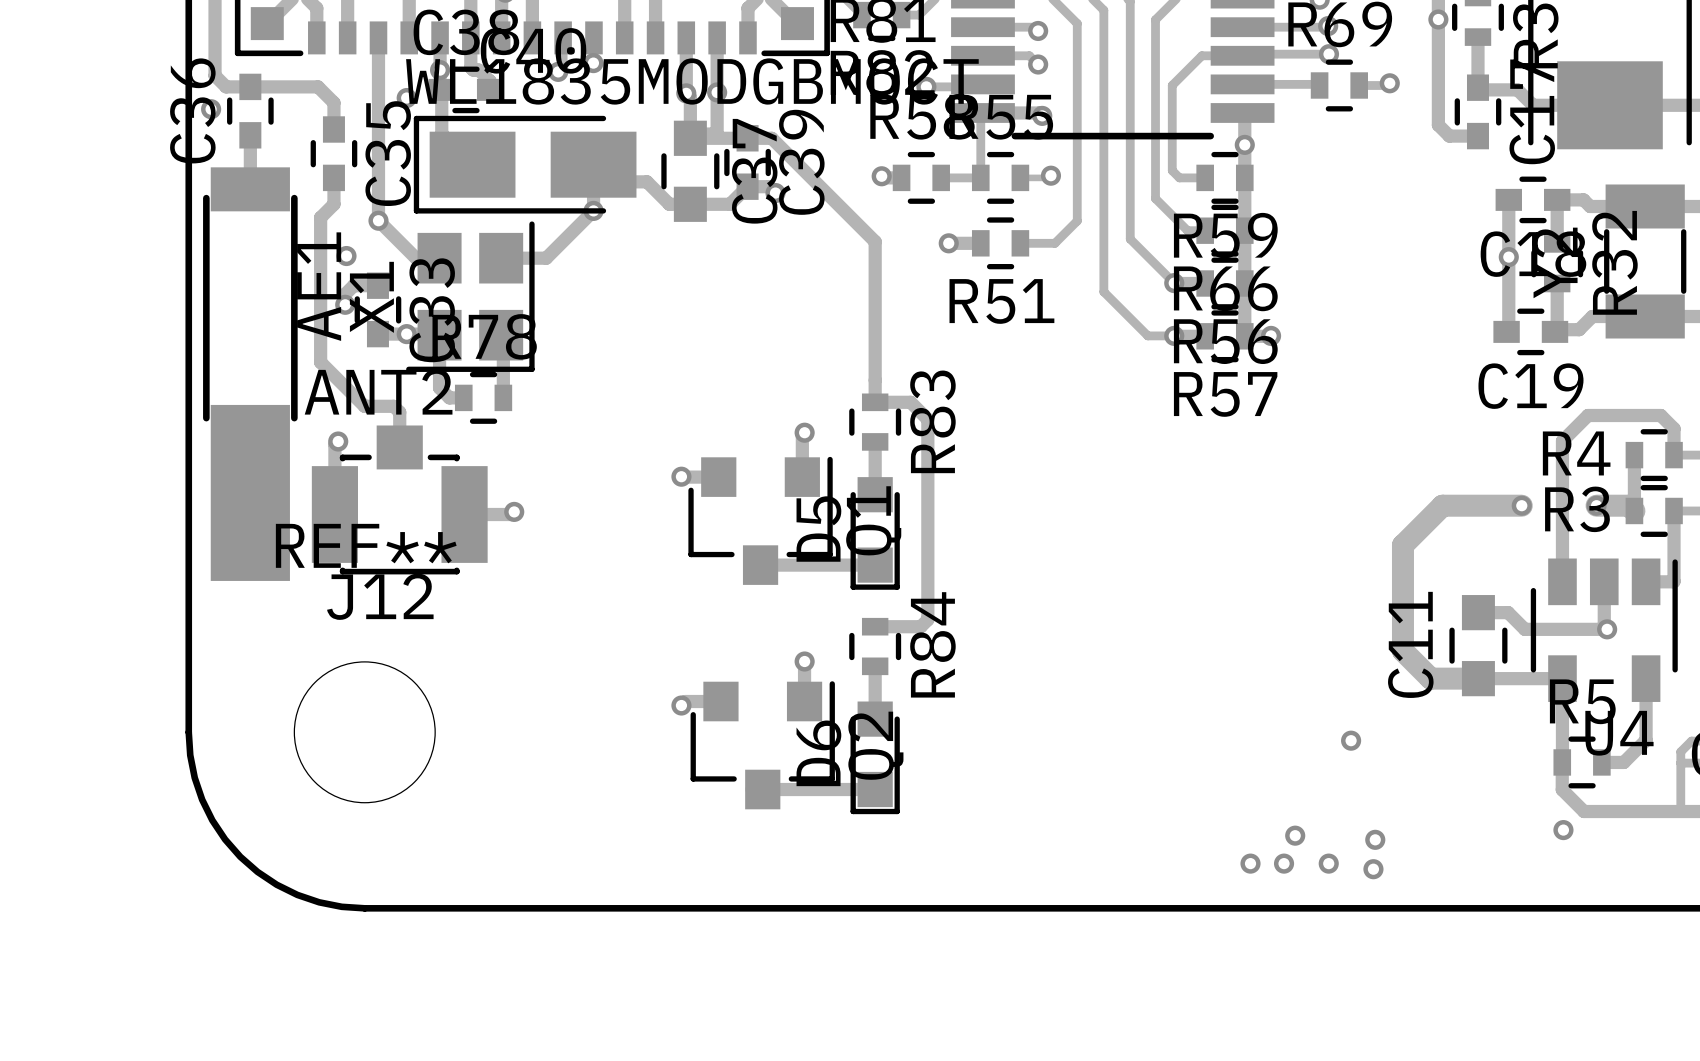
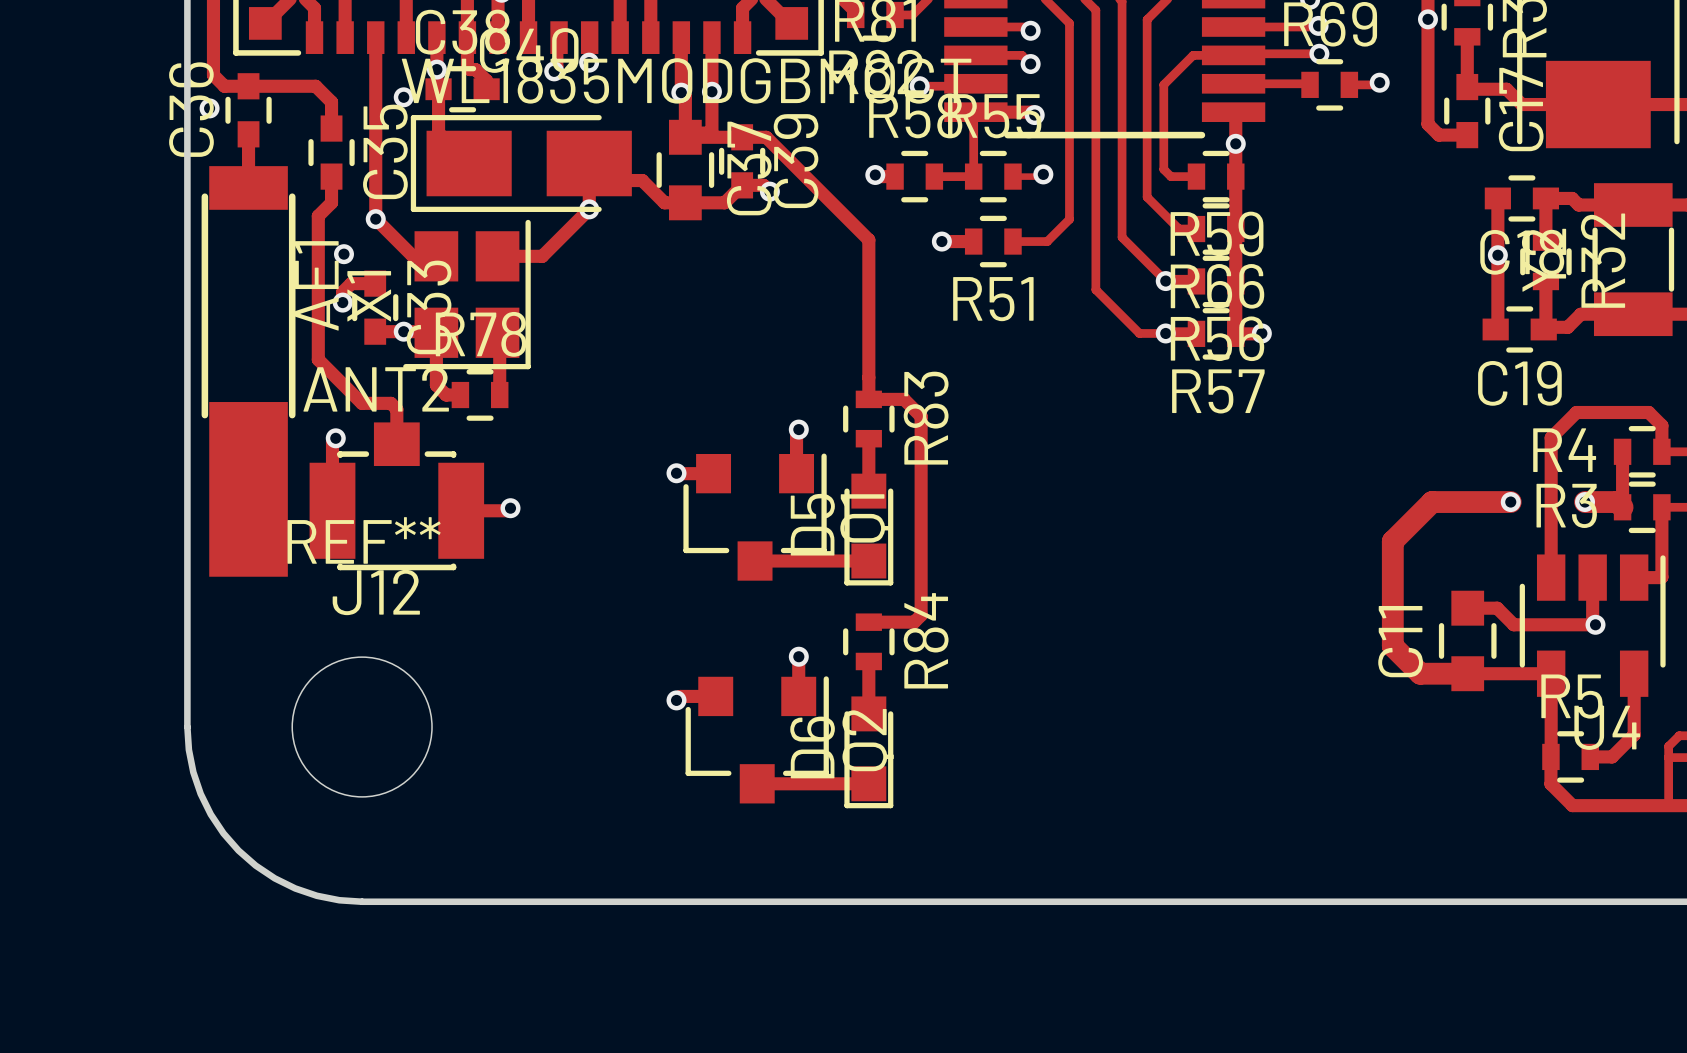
via: (1351, 740) -> none
via: (1563, 830) -> none
via: (1295, 835) -> none
via: (1375, 839) -> none
via: (1250, 863) -> none
via: (1284, 863) -> none
via: (1328, 863) -> none
via: (1373, 869) -> none

